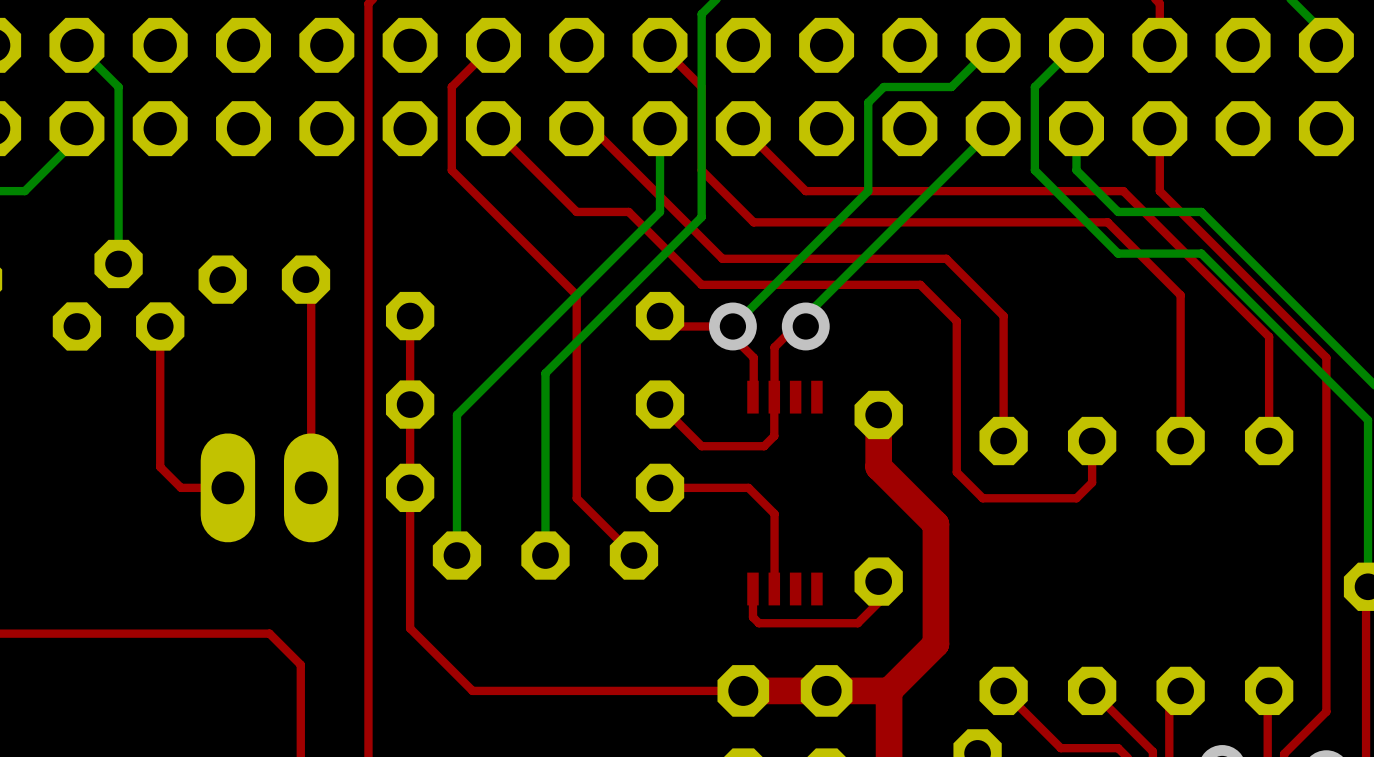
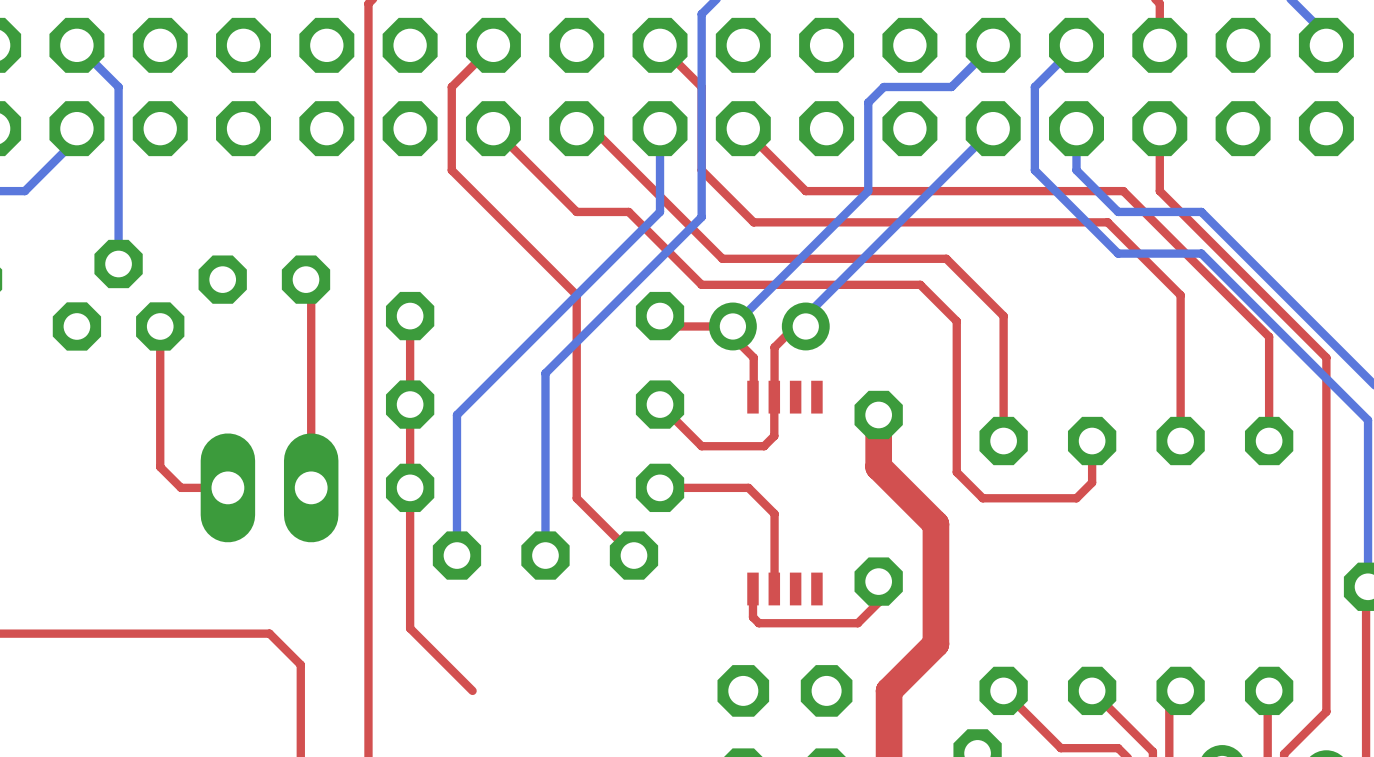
top track: (889, 690) (472, 690) -> none

